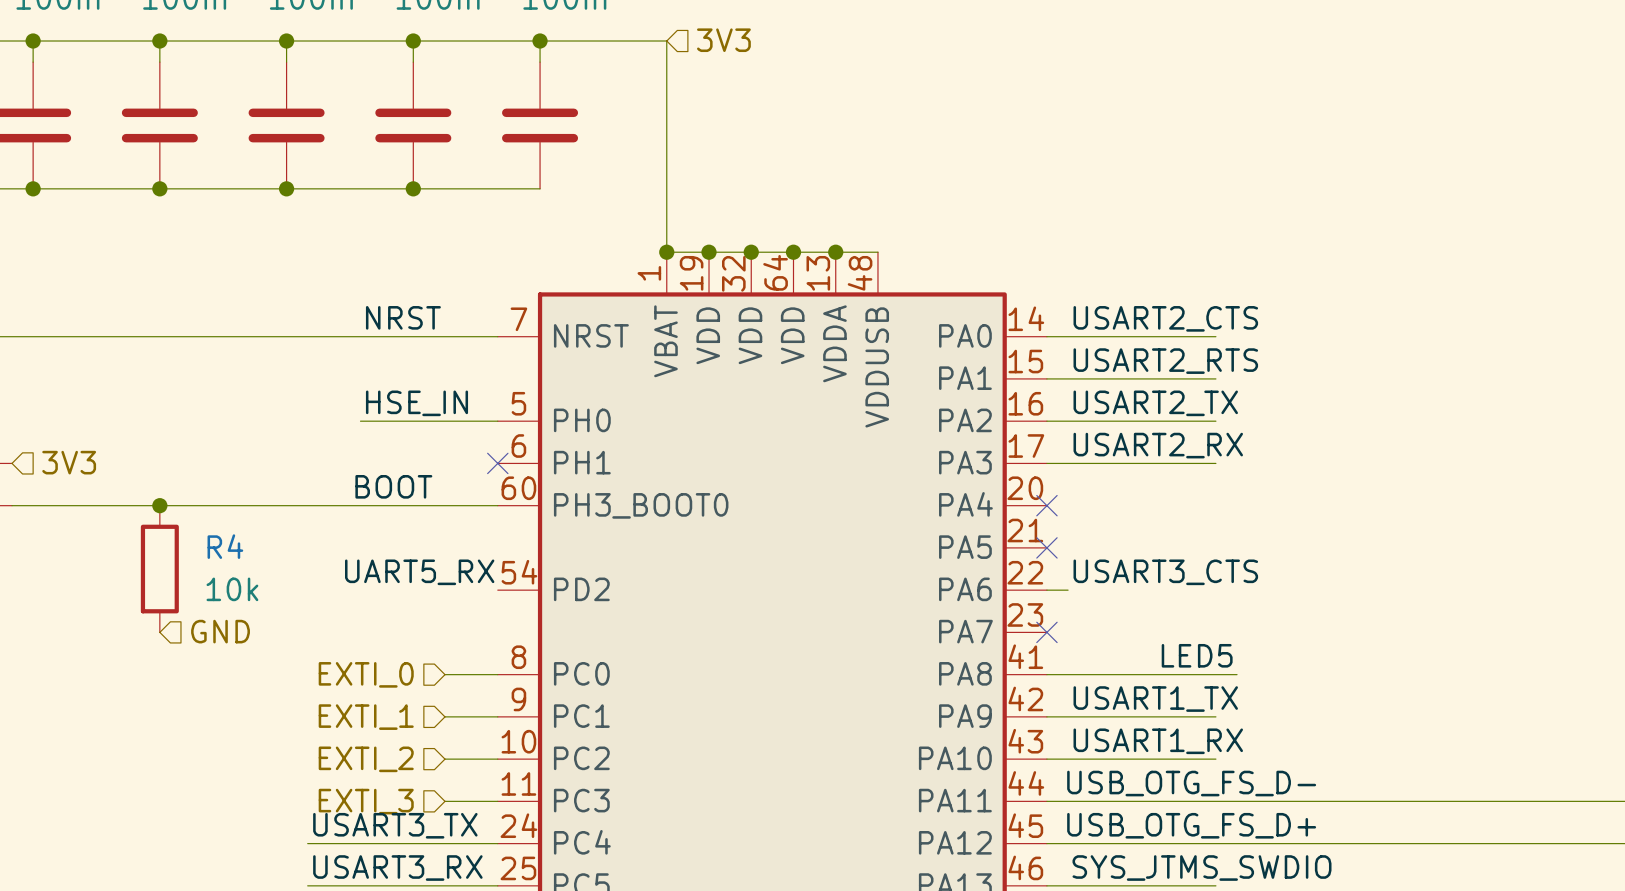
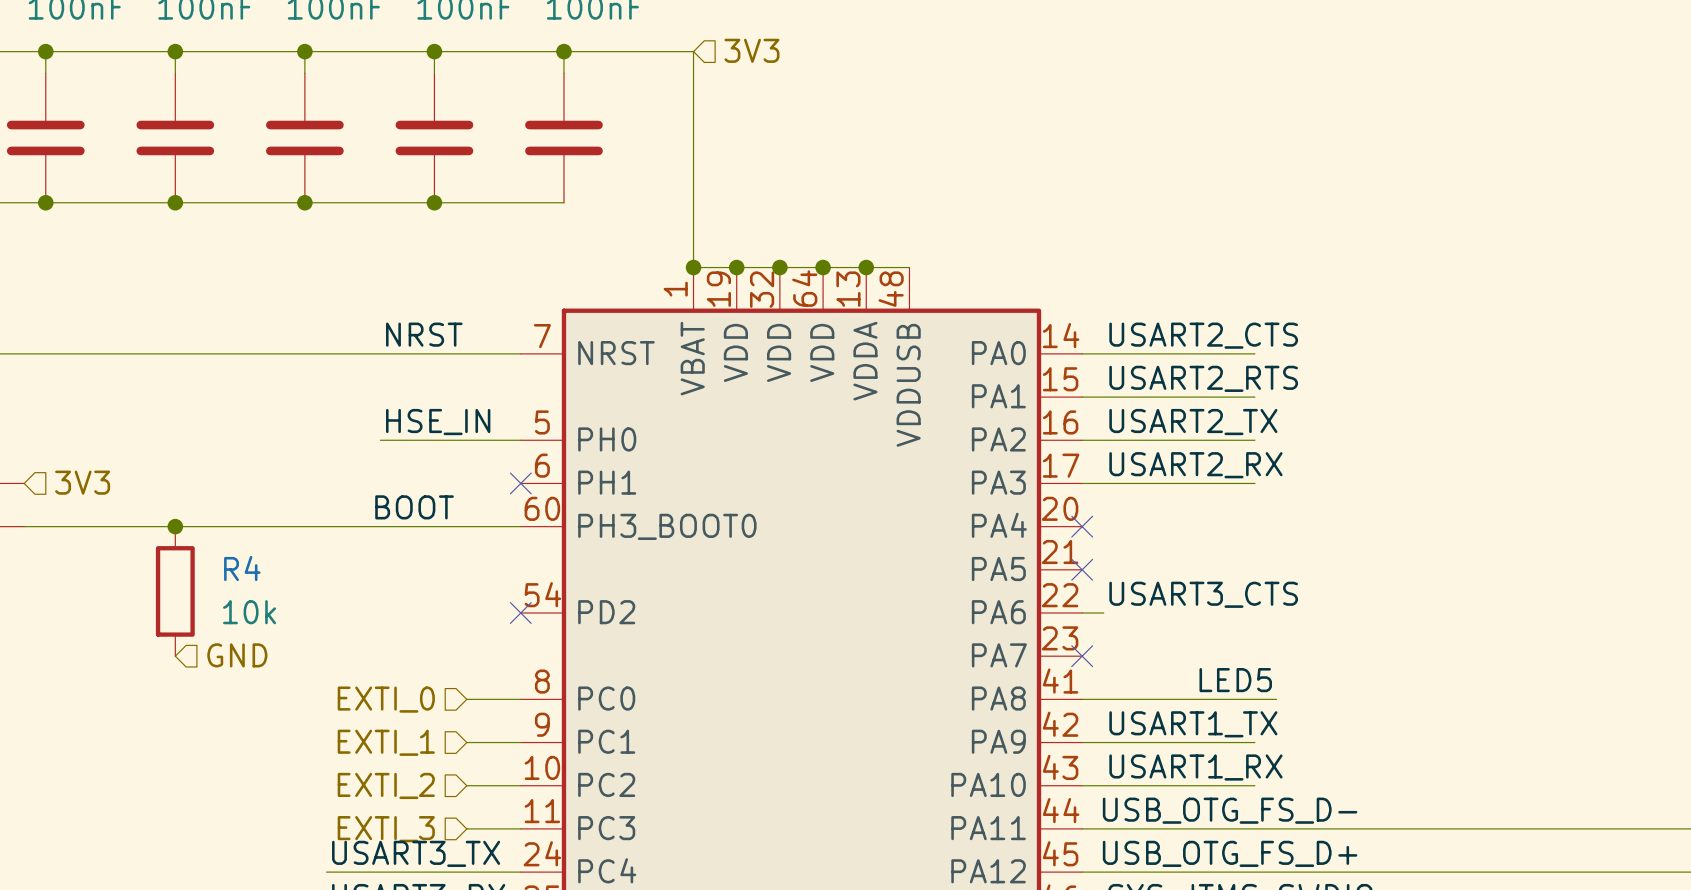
label: UART5_RX (419, 572) -> none
no-connect mark: none -> (520, 613)

